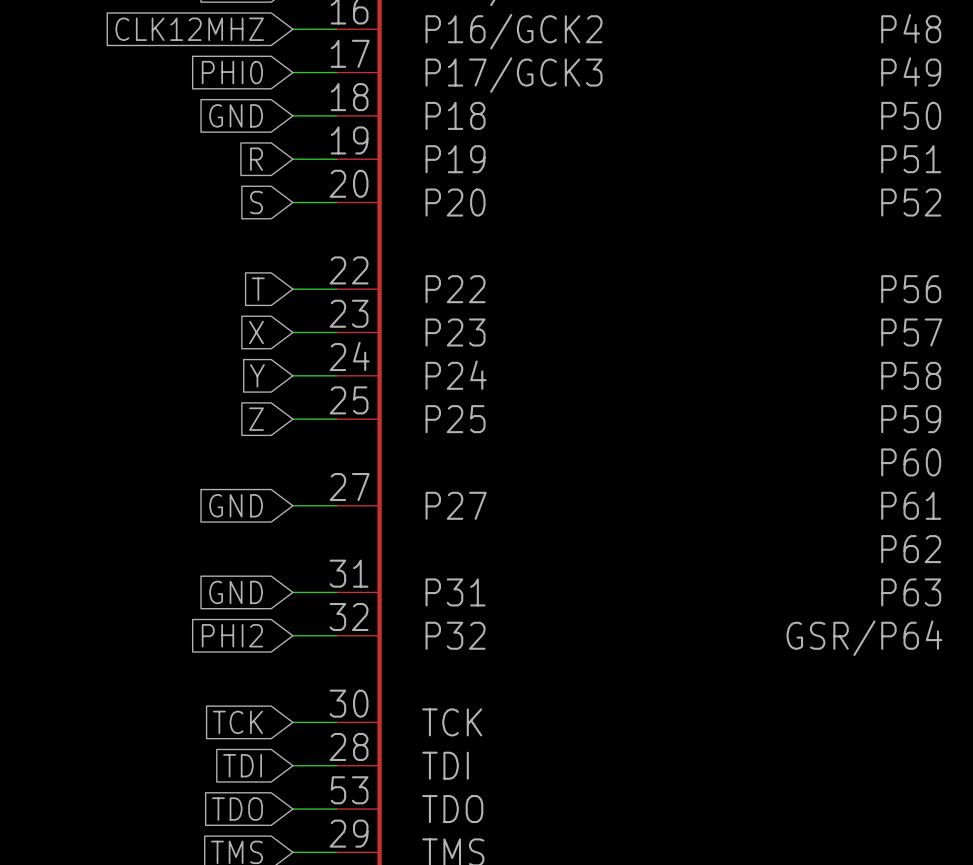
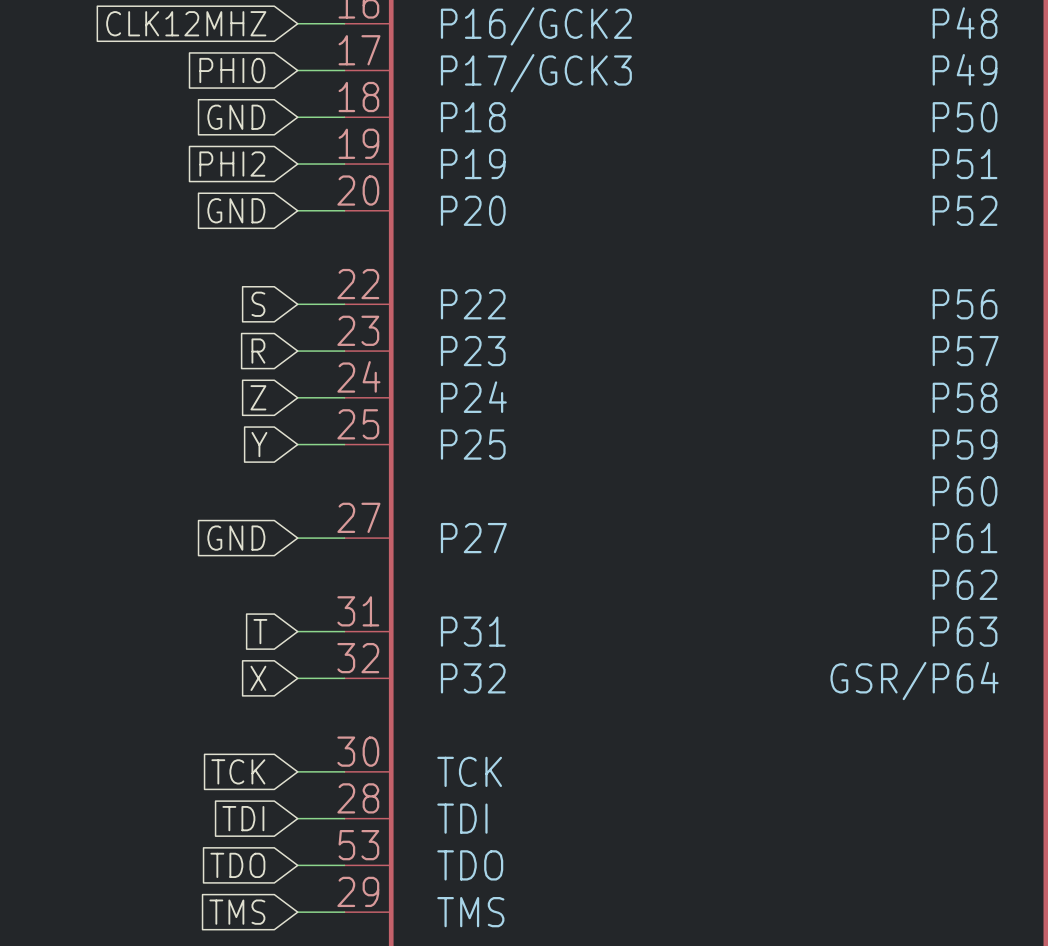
global label: R (256, 159) -> PHI2 (232, 164)
global label: S (256, 202) -> GND (236, 210)
global label: T (258, 289) -> S (258, 304)
global label: X (256, 332) -> R (258, 351)
global label: Y (257, 375) -> Z (258, 397)
global label: Z (256, 419) -> Y (259, 444)
global label: GND (236, 592) -> T (260, 631)
global label: PHI2 (232, 635) -> X (258, 678)

